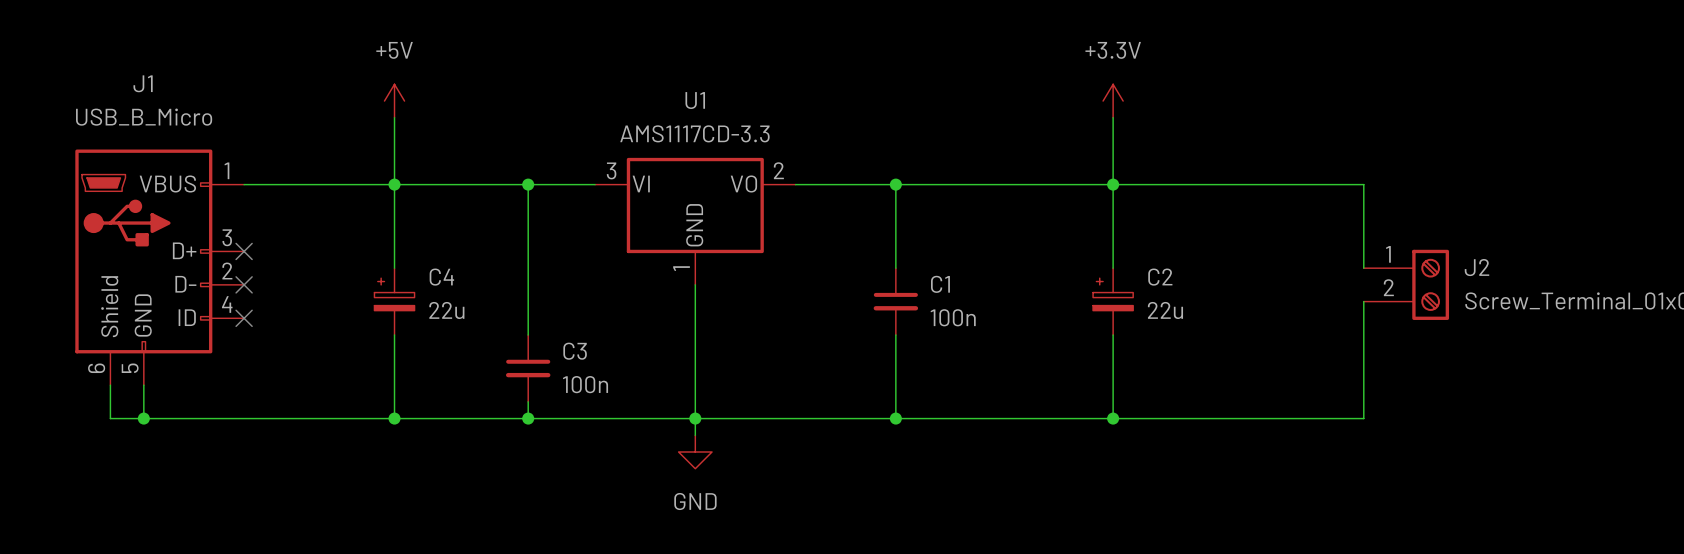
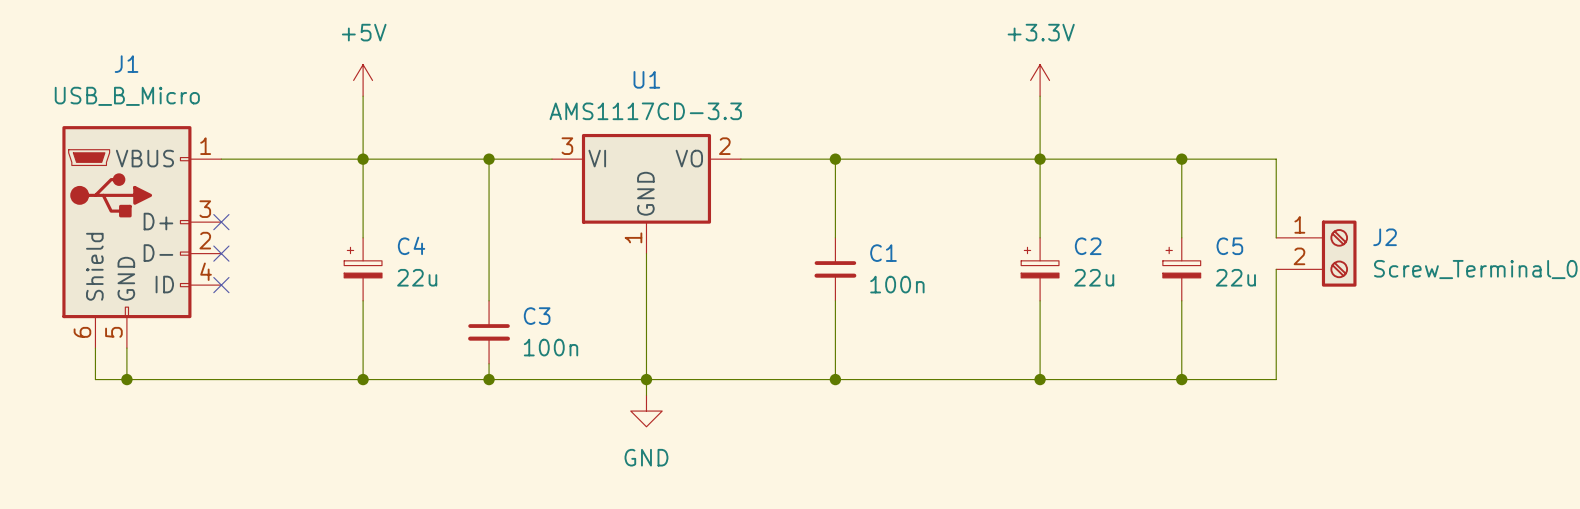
wire: none -> (1181, 159) (1181, 237)
junction: none -> (1181, 159)
C5: none -> 22u (1181, 269)
wire: none -> (1181, 300) (1181, 379)
junction: none -> (1181, 379)

